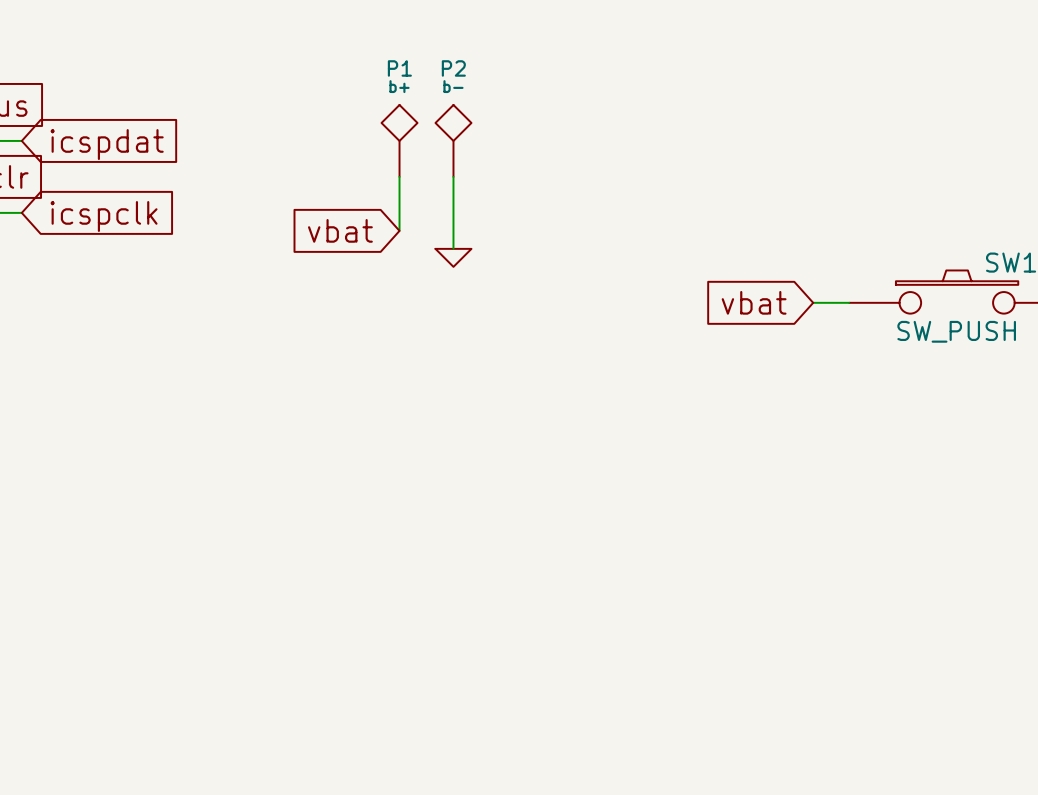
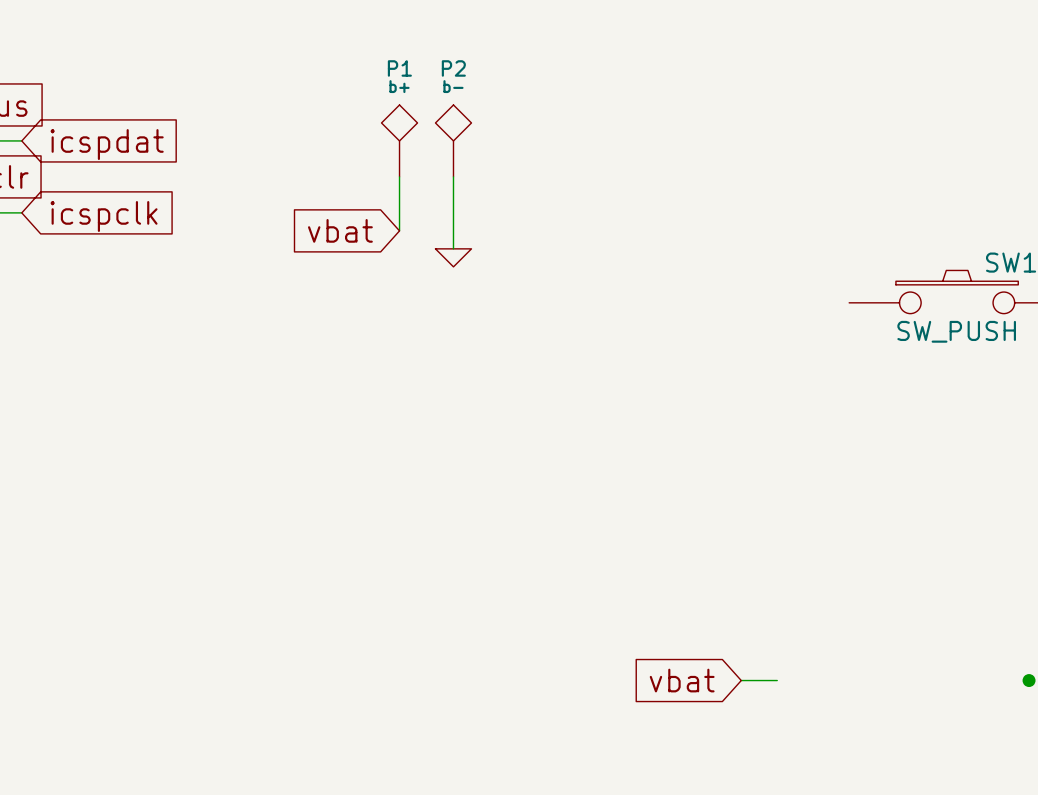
global label: vbat (754, 302) -> none
wire: (813, 302) (849, 302) -> none
global label: none -> vbat (682, 680)
wire: none -> (741, 680) (777, 680)
junction: none -> (1029, 680)

